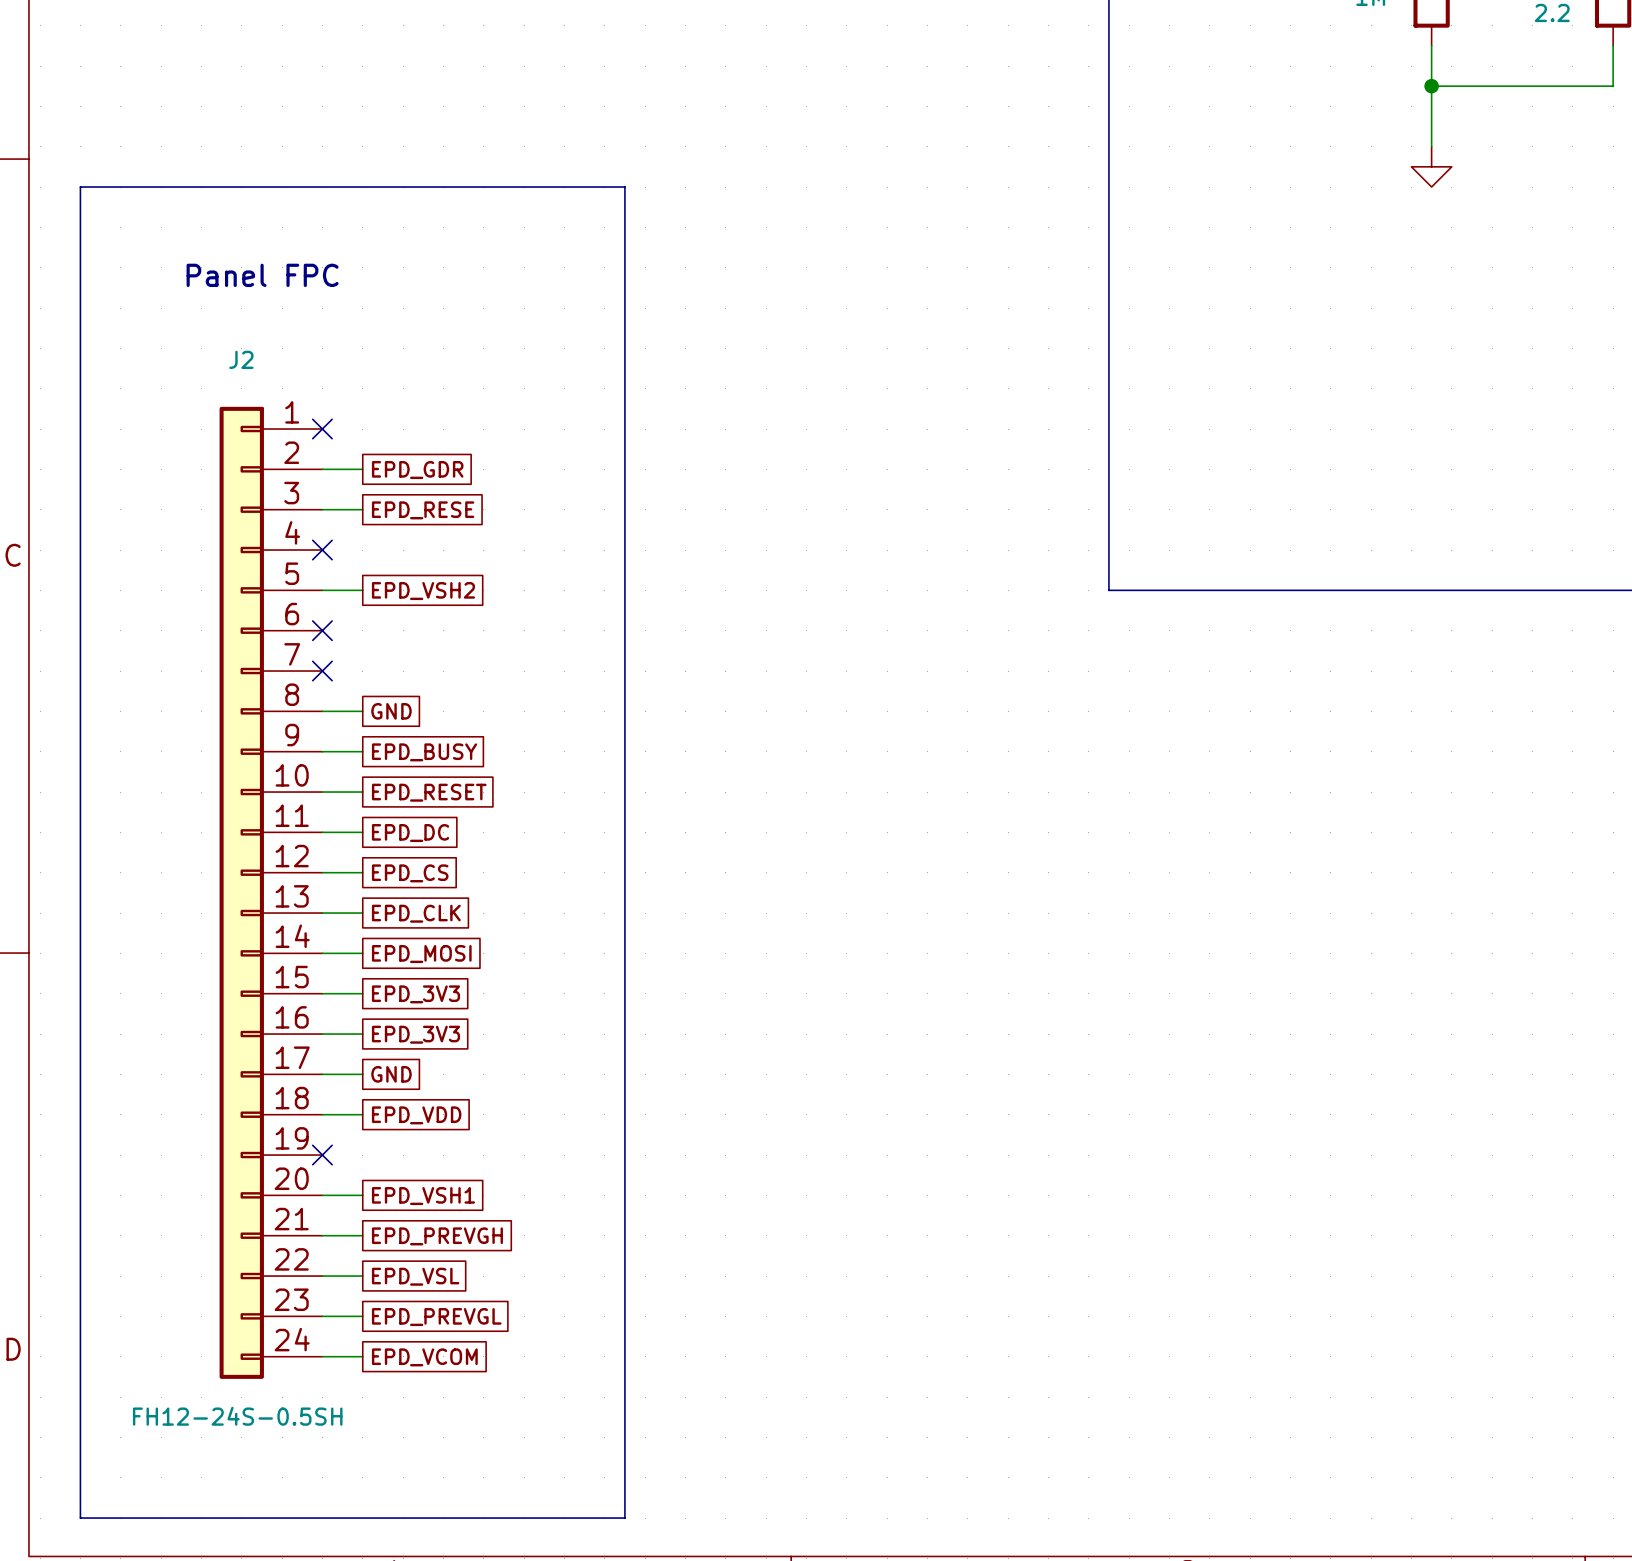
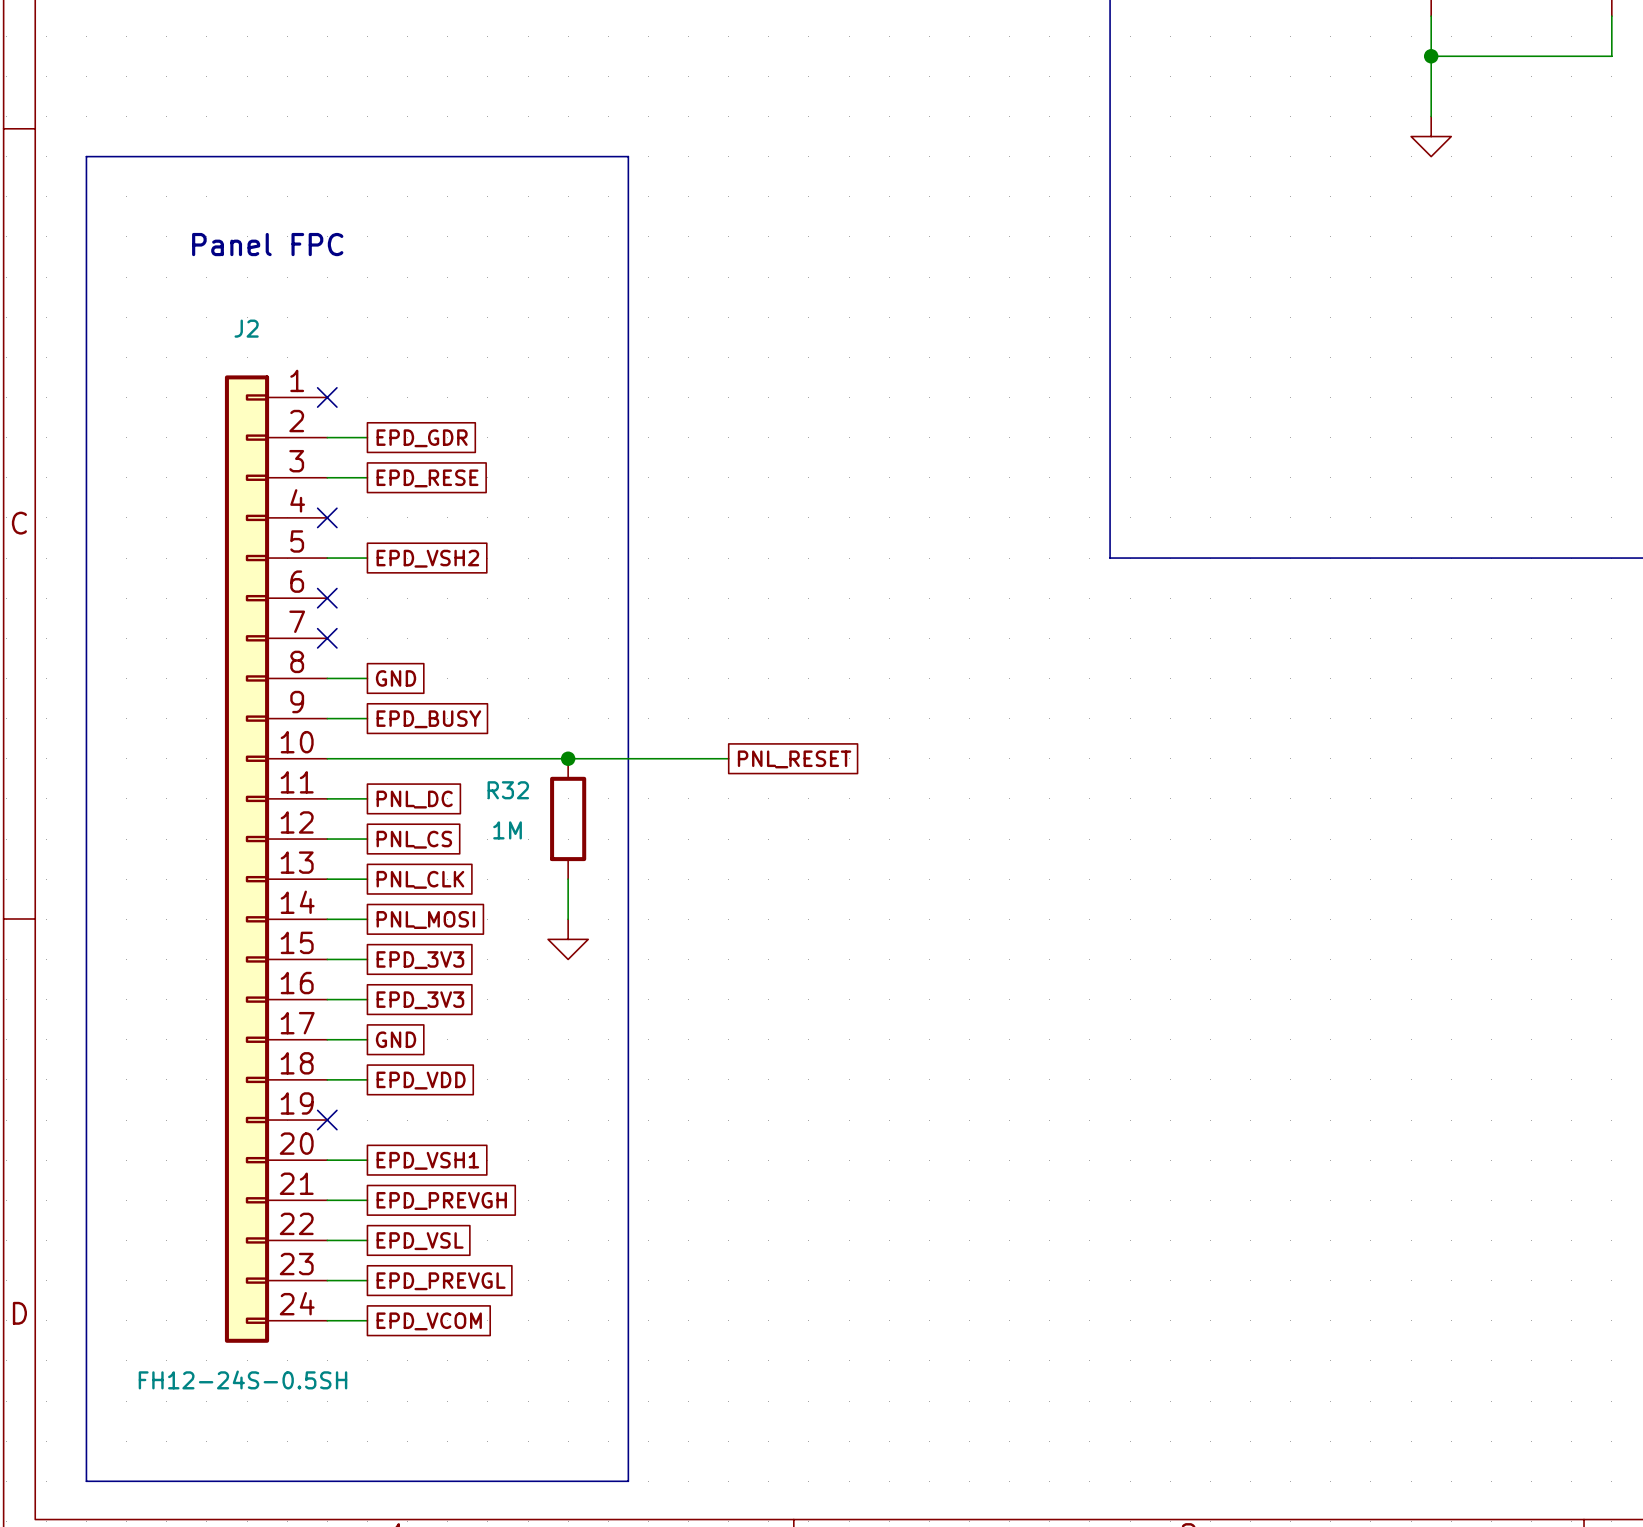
wire: none -> (367, 758) (728, 758)
global label: EPD_RESET (429, 792) -> none
junction: none -> (568, 758)
global label: none -> PNL_RESET (794, 759)
global label: EPD_DC (410, 833) -> PNL_DC (414, 799)
R32: none -> 1M (568, 818)
global label: EPD_CS (410, 873) -> PNL_CS (414, 839)
global label: EPD_CLK (416, 913) -> PNL_CLK (420, 879)
wire: none -> (568, 879) (568, 919)
global label: EPD_MOSI (421, 954) -> PNL_MOSI (425, 919)
power symbol: none -> (568, 939)

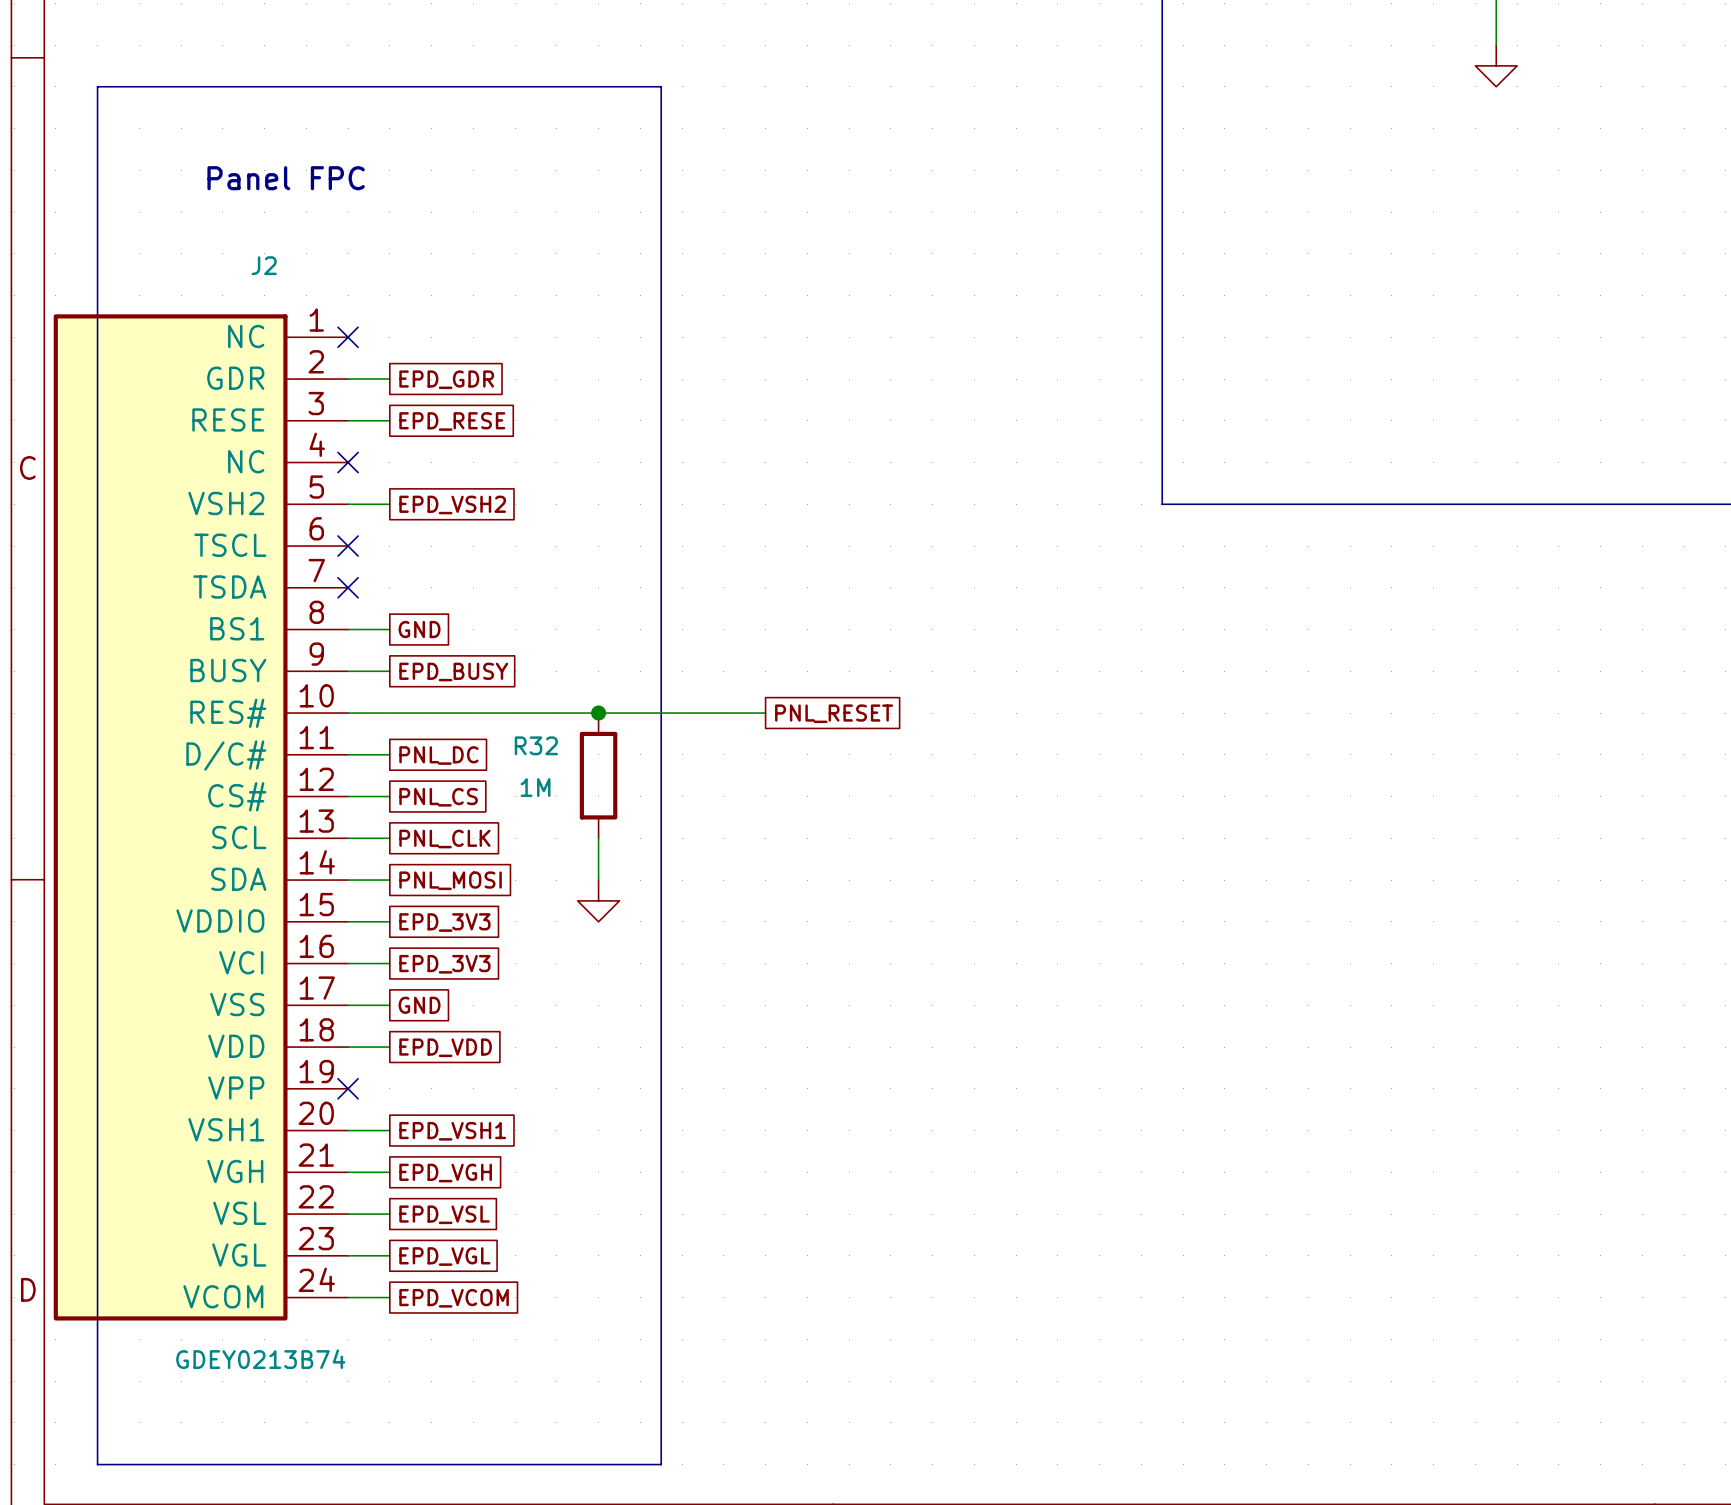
J2 symbol: [224, 375, 328, 1343] -> [53, 314, 349, 1321]
global label: EPD_PREVGH (441, 1200) -> EPD_VGH (445, 1173)
global label: EPD_PREVGL (441, 1281) -> EPD_VGL (444, 1256)
J2 value: FH12-24S-0.5SH (242, 1379) -> GDEY0213B74 (260, 1359)

